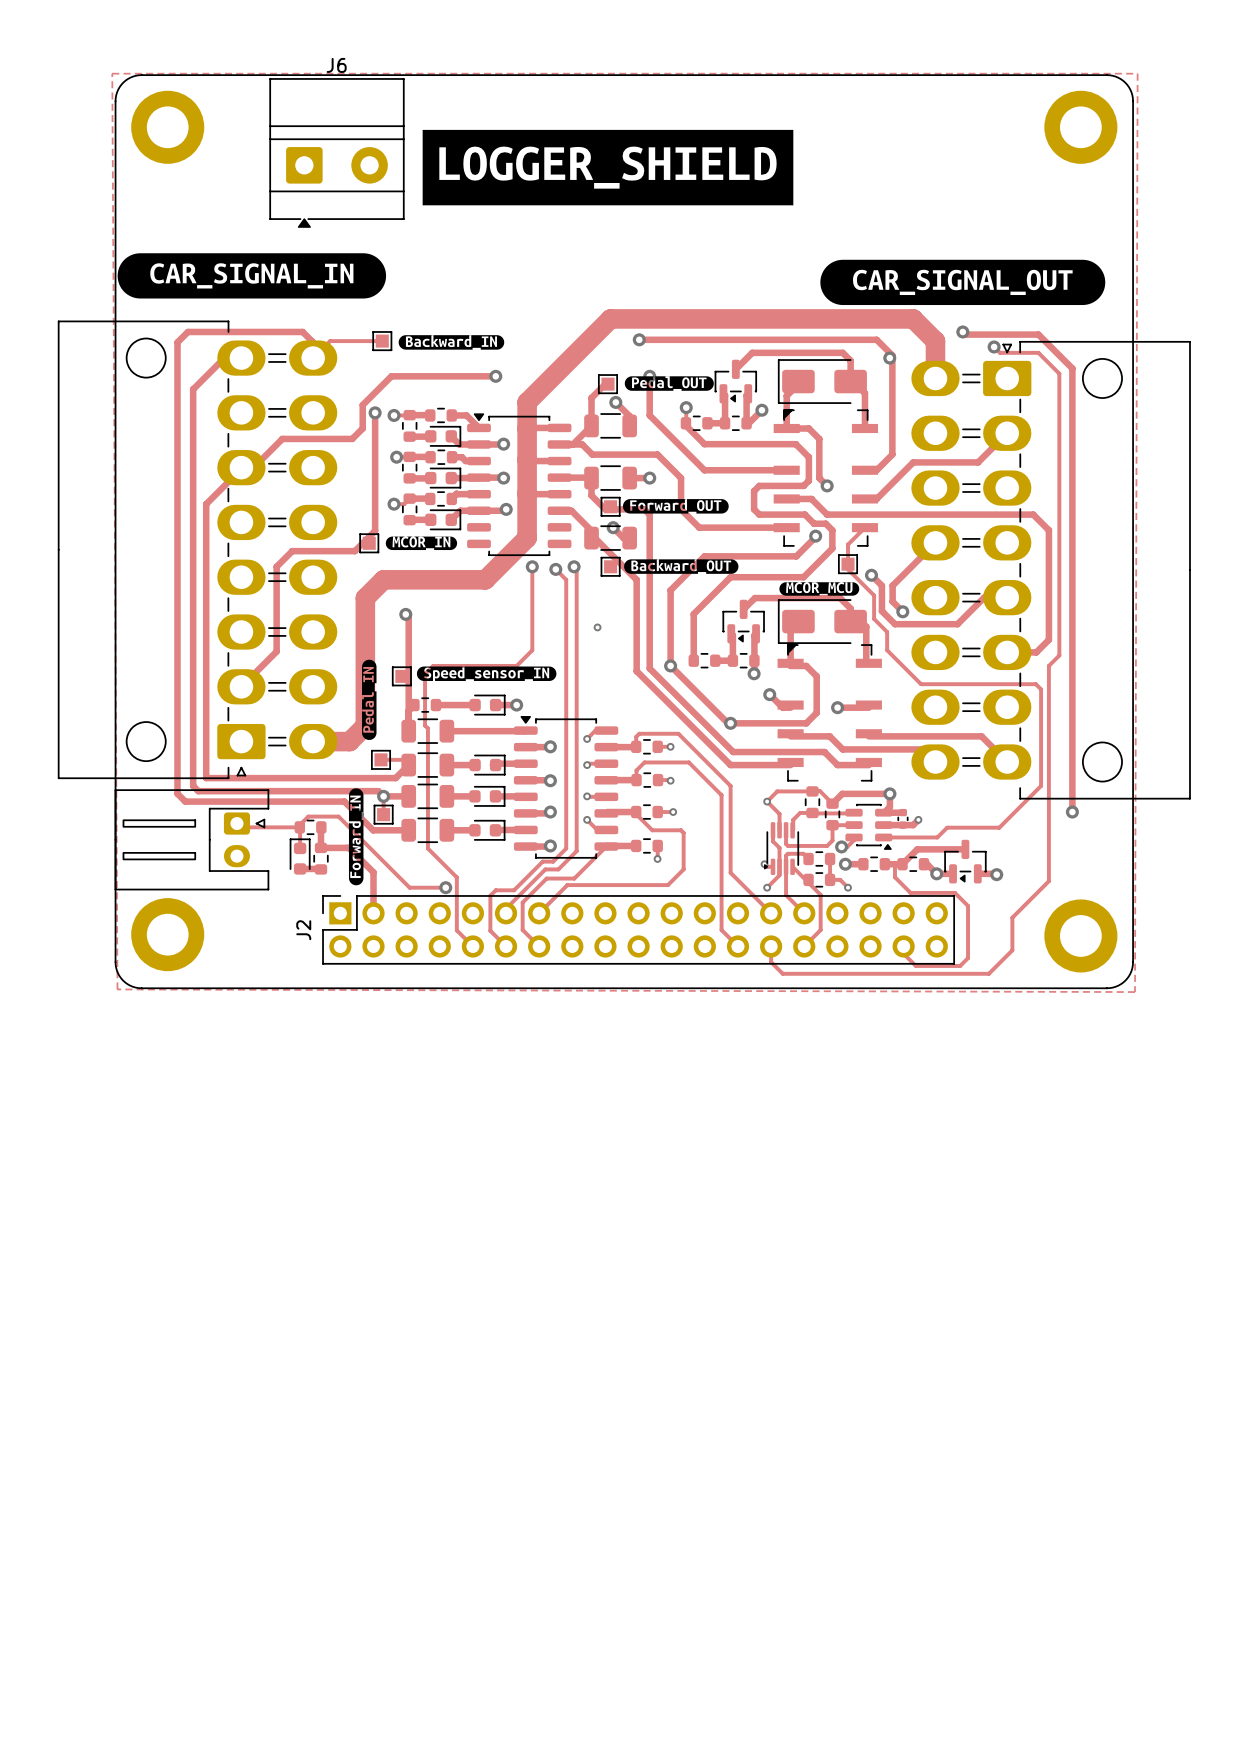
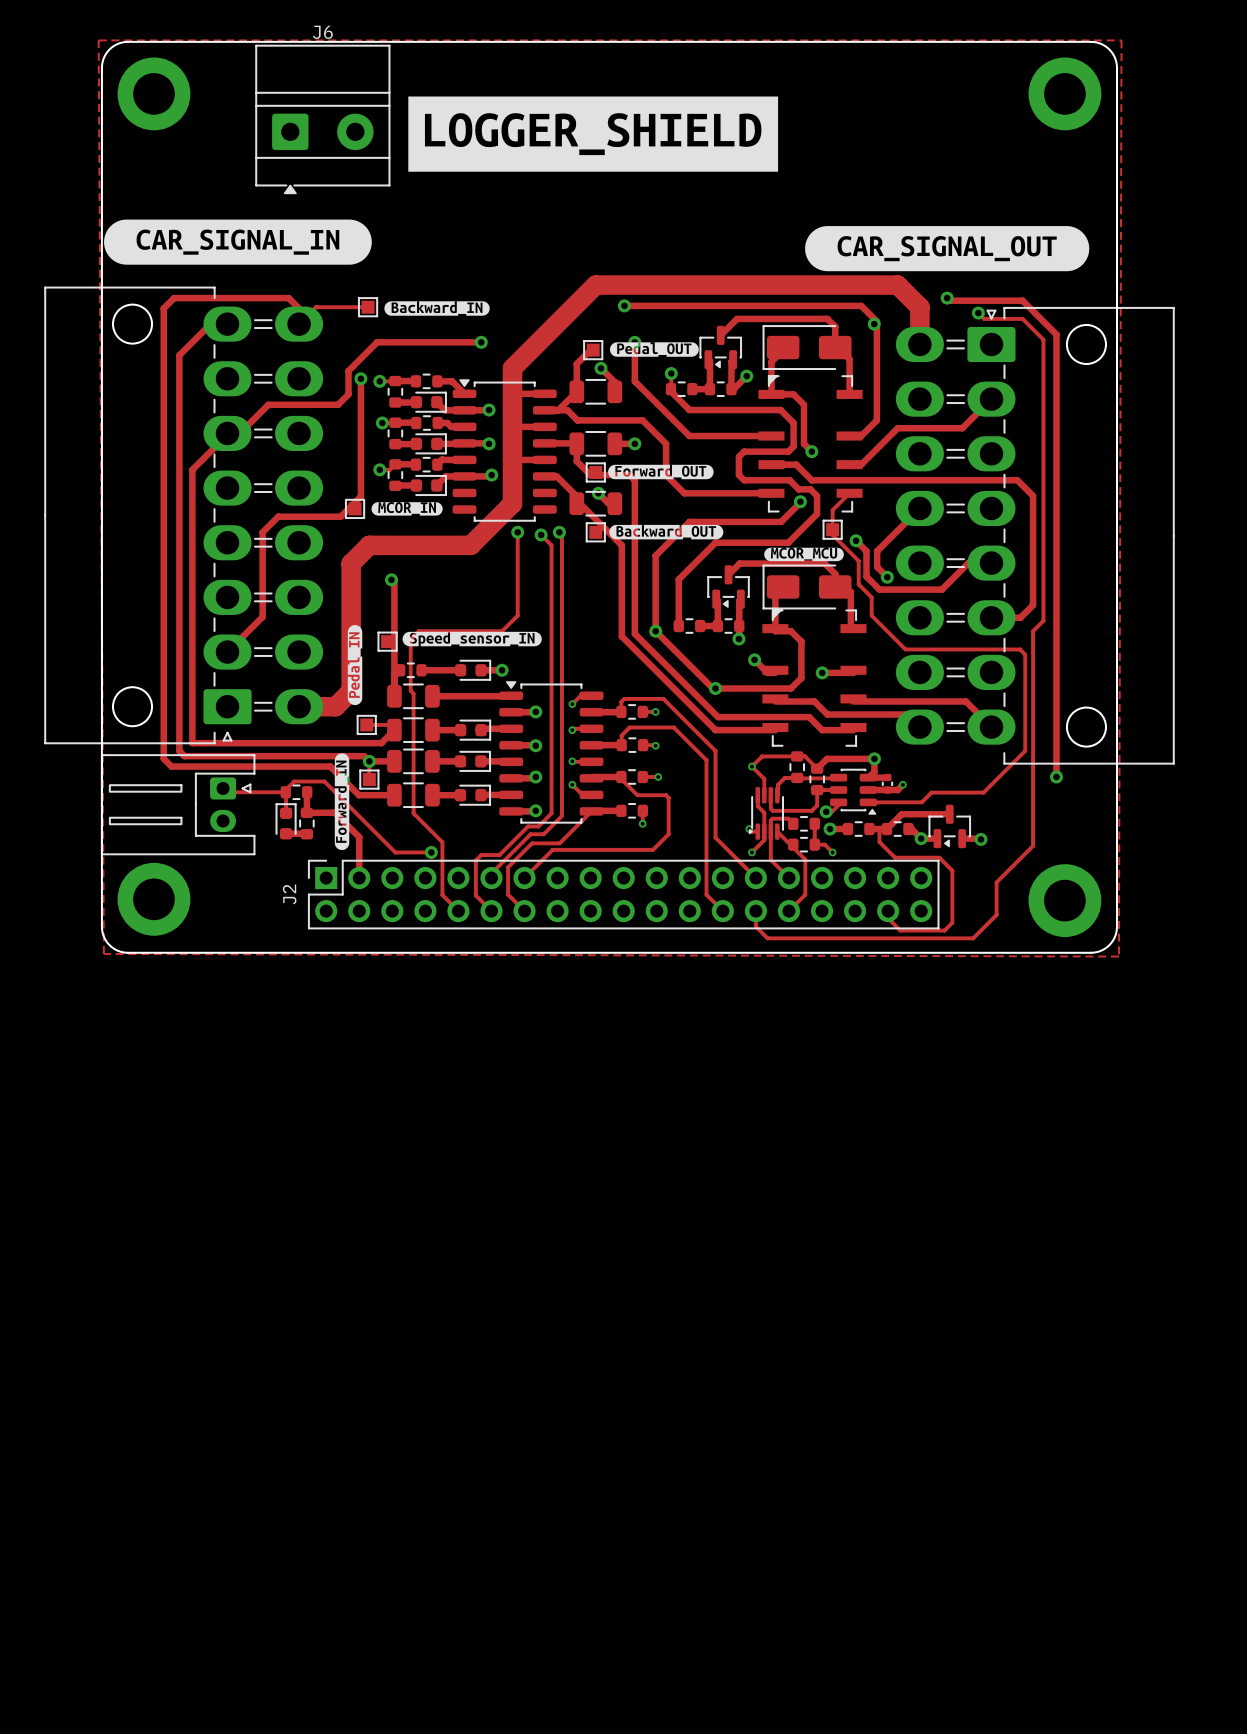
via: (597, 627) -> none

